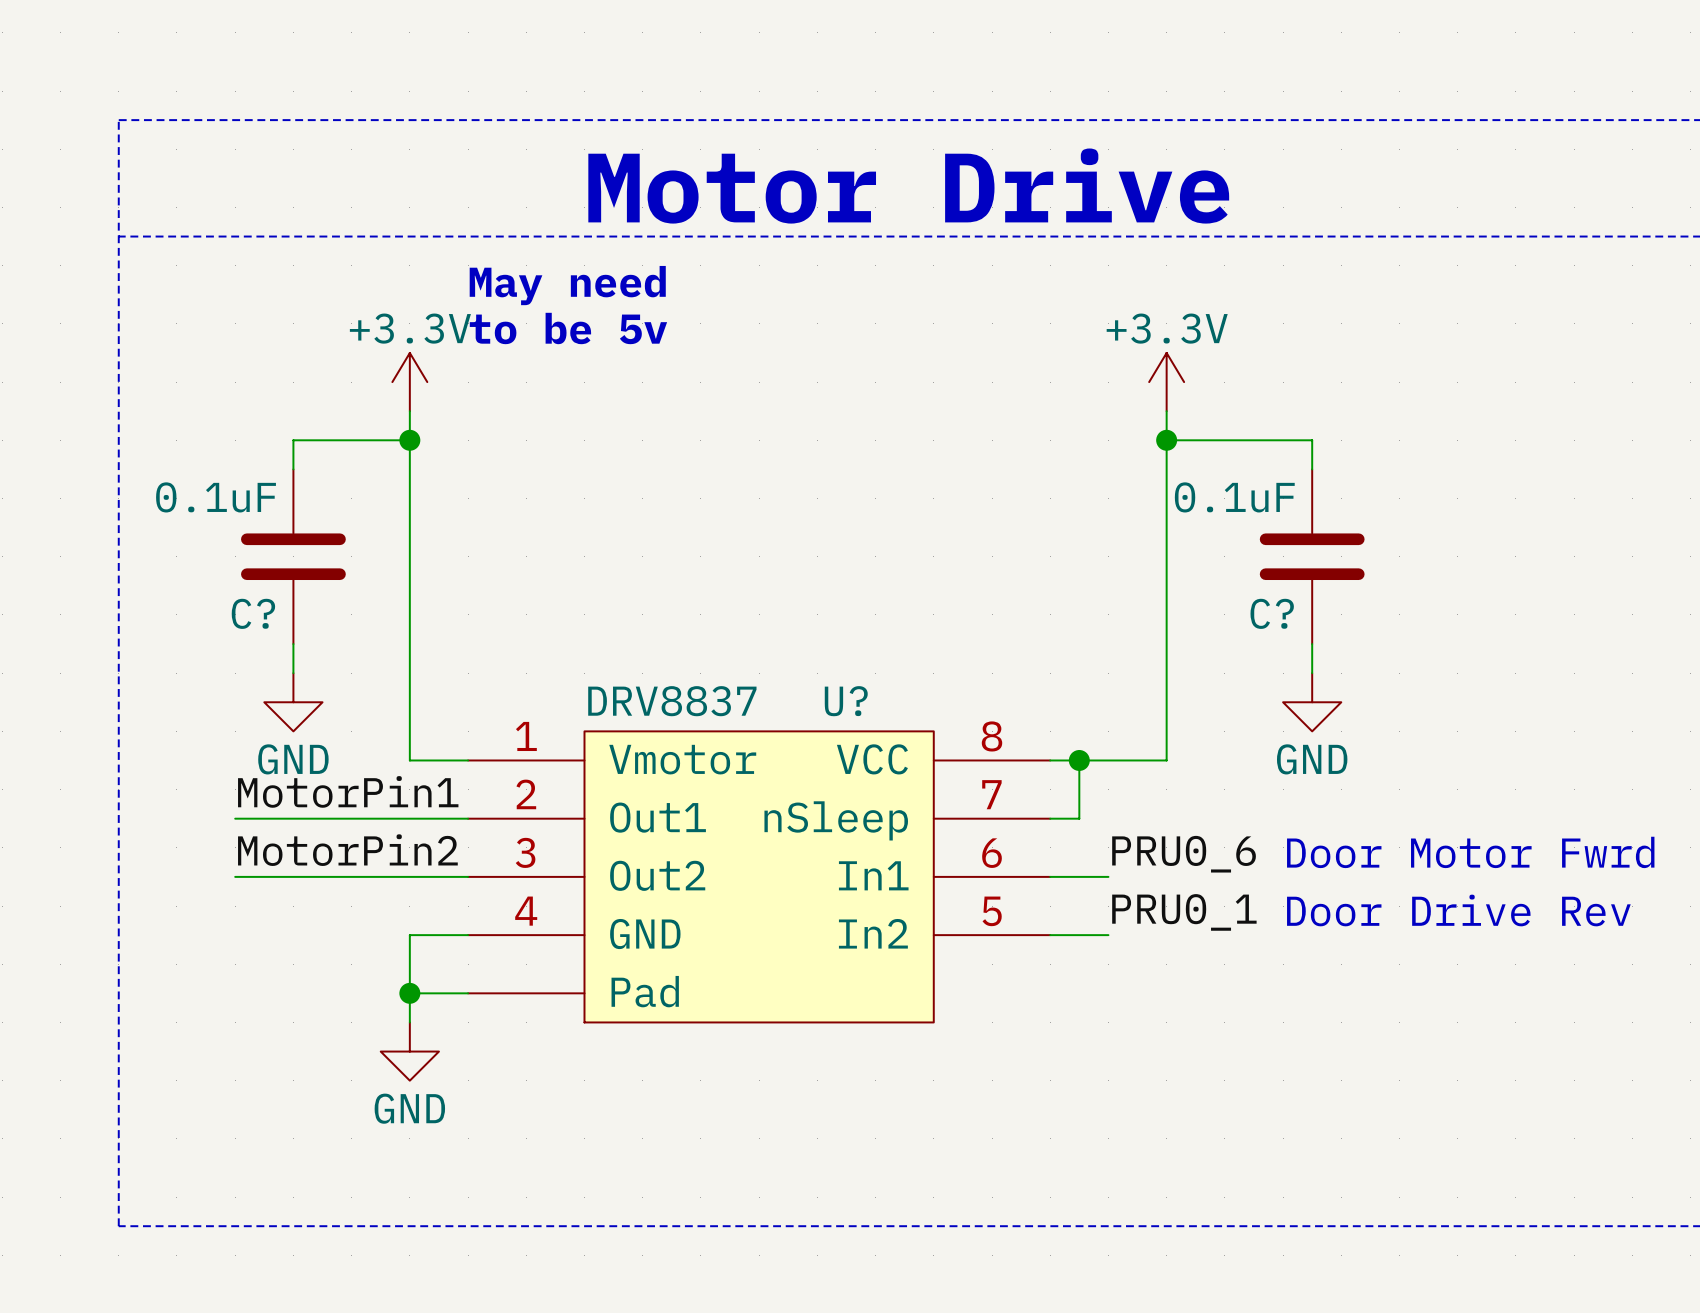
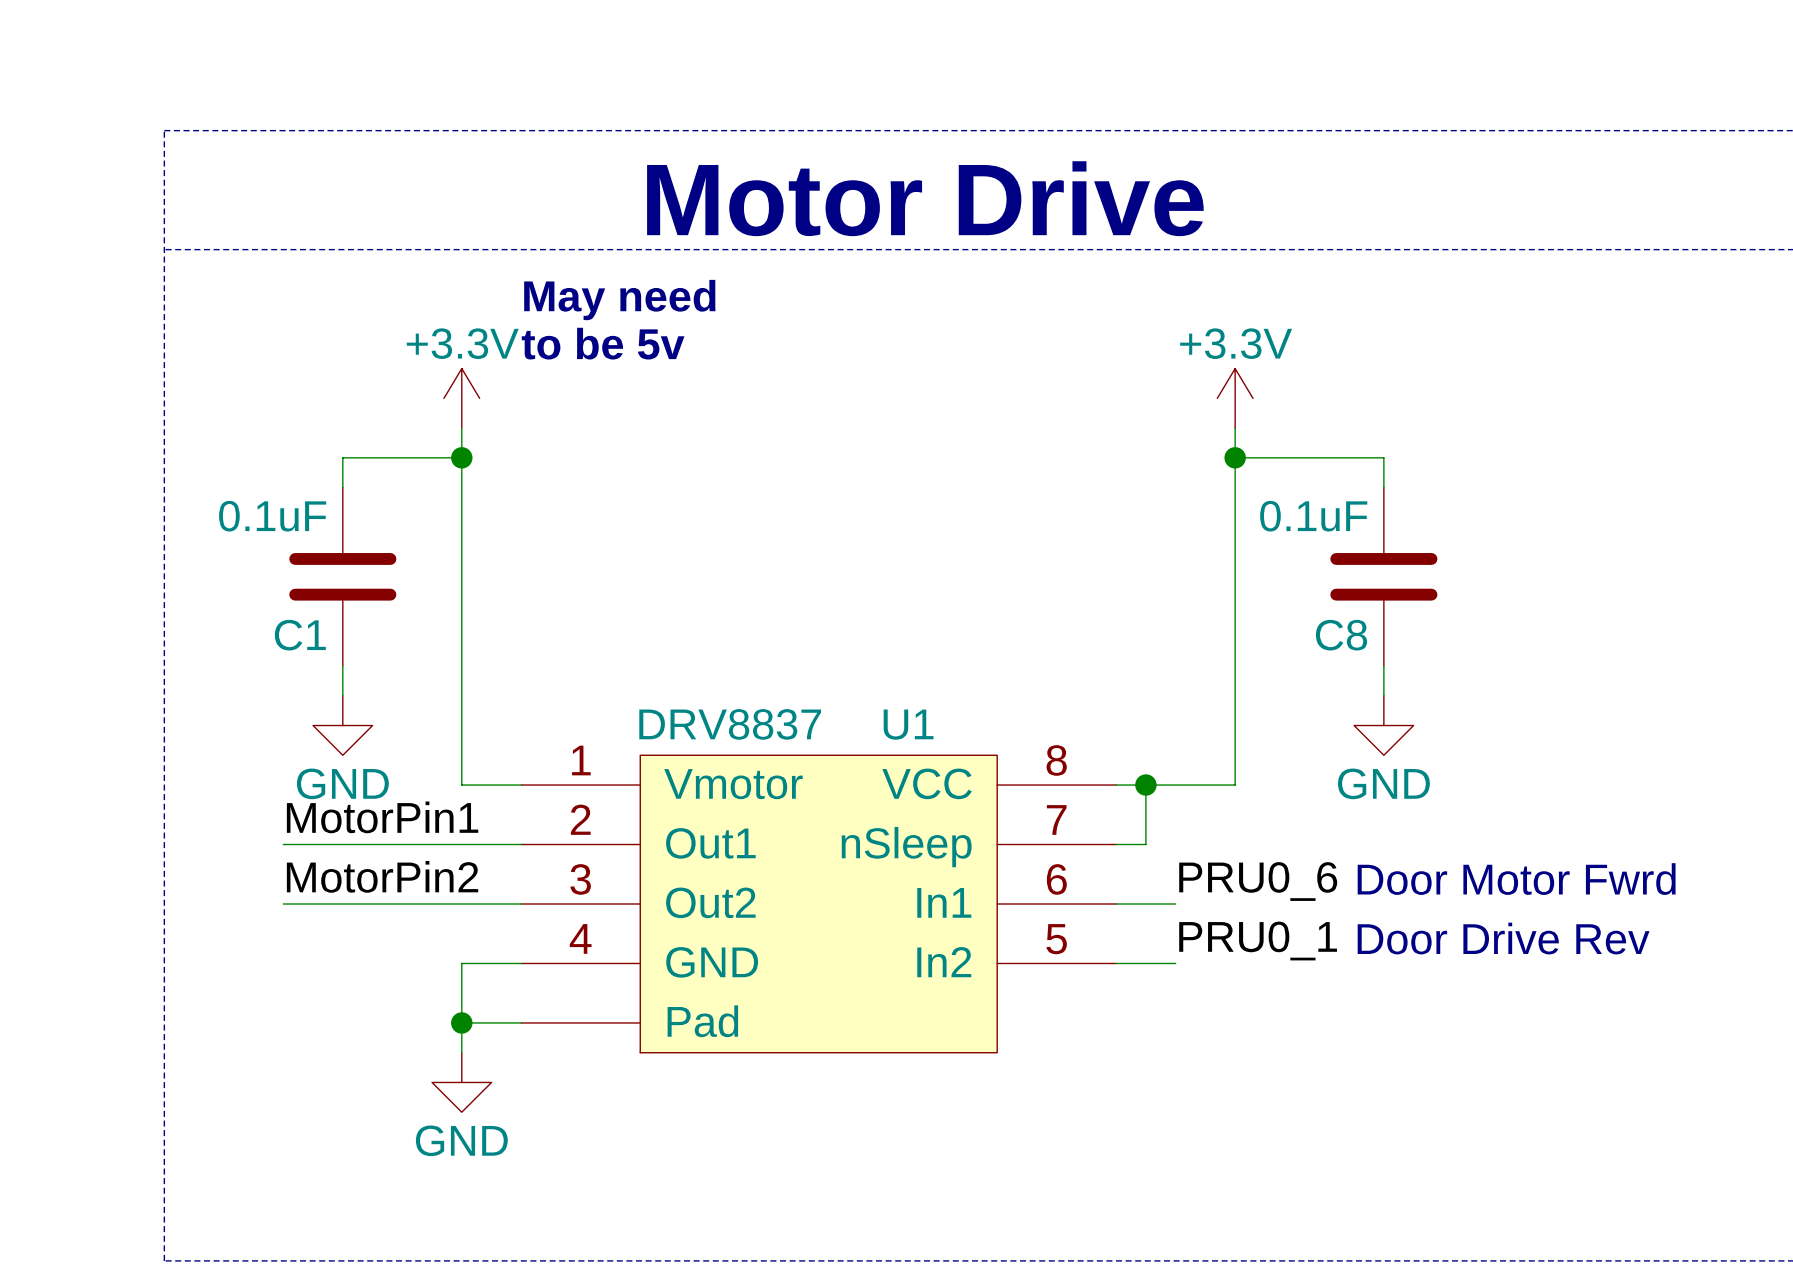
C? name: C? (253, 613) -> C1 (300, 635)
C? name: C? (1272, 613) -> C8 (1341, 635)
U? name: U? (846, 701) -> U1 (908, 724)

